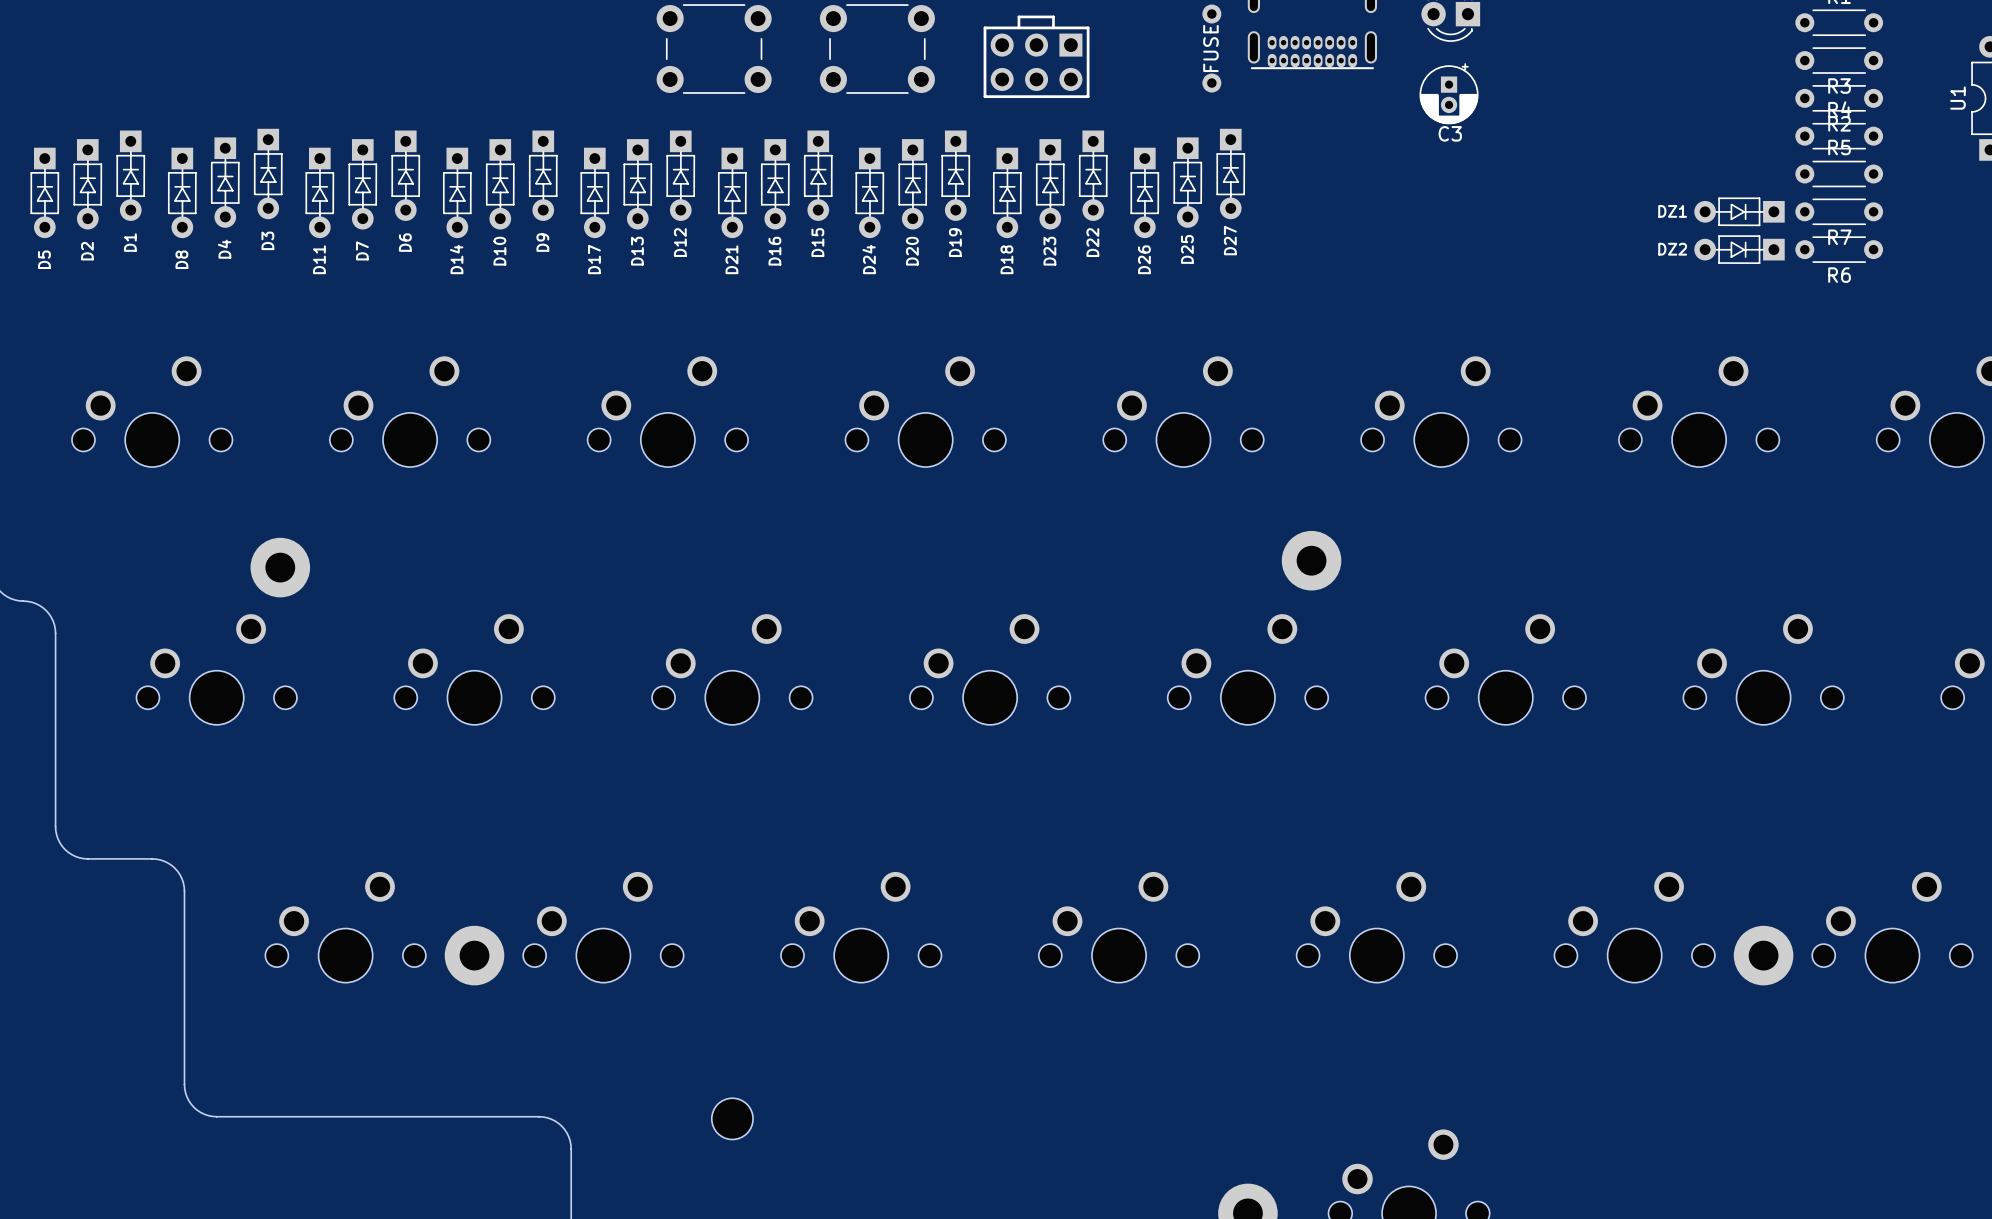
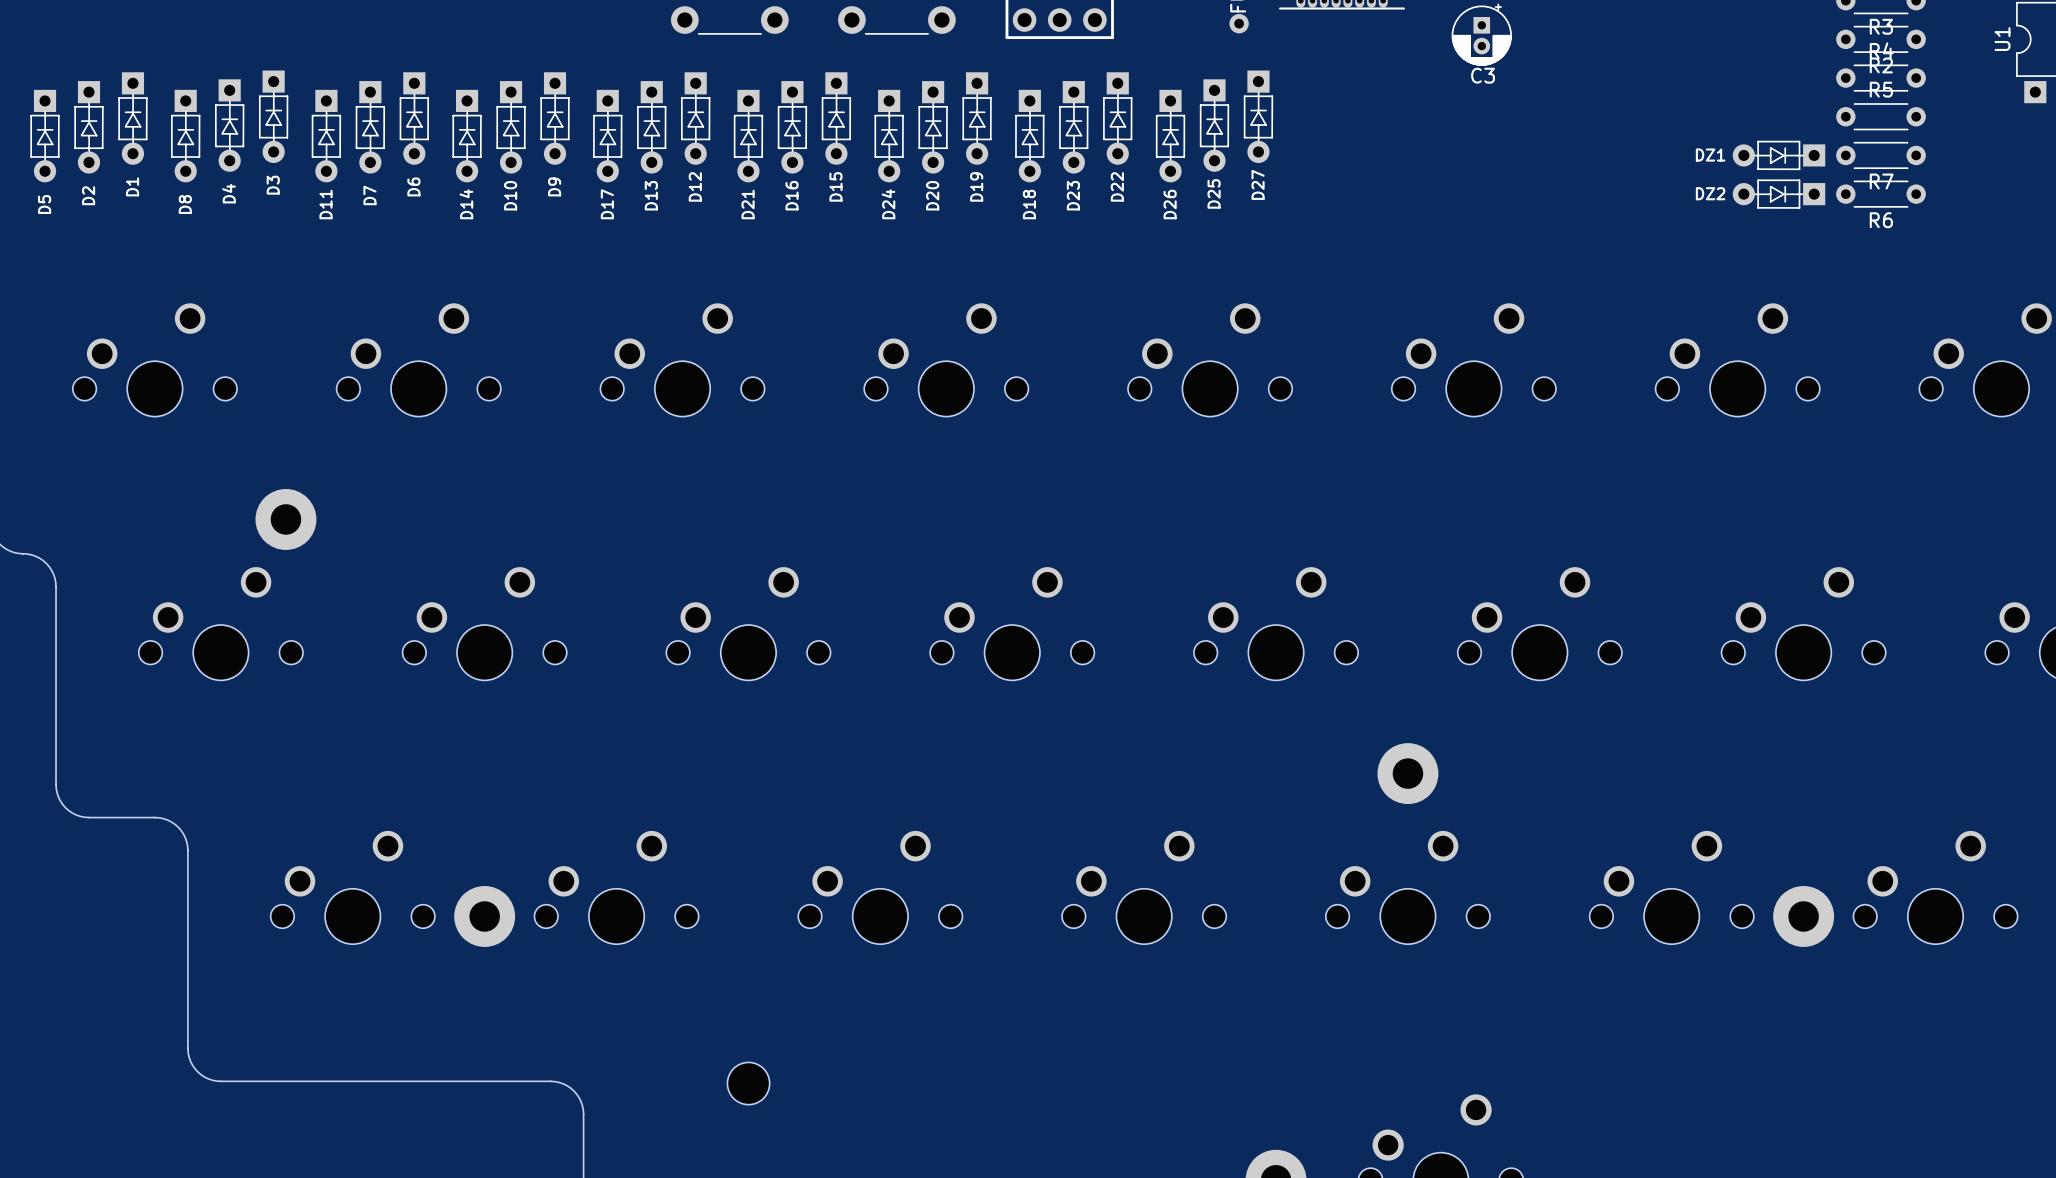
part position: (1311, 560) -> (1407, 773)

